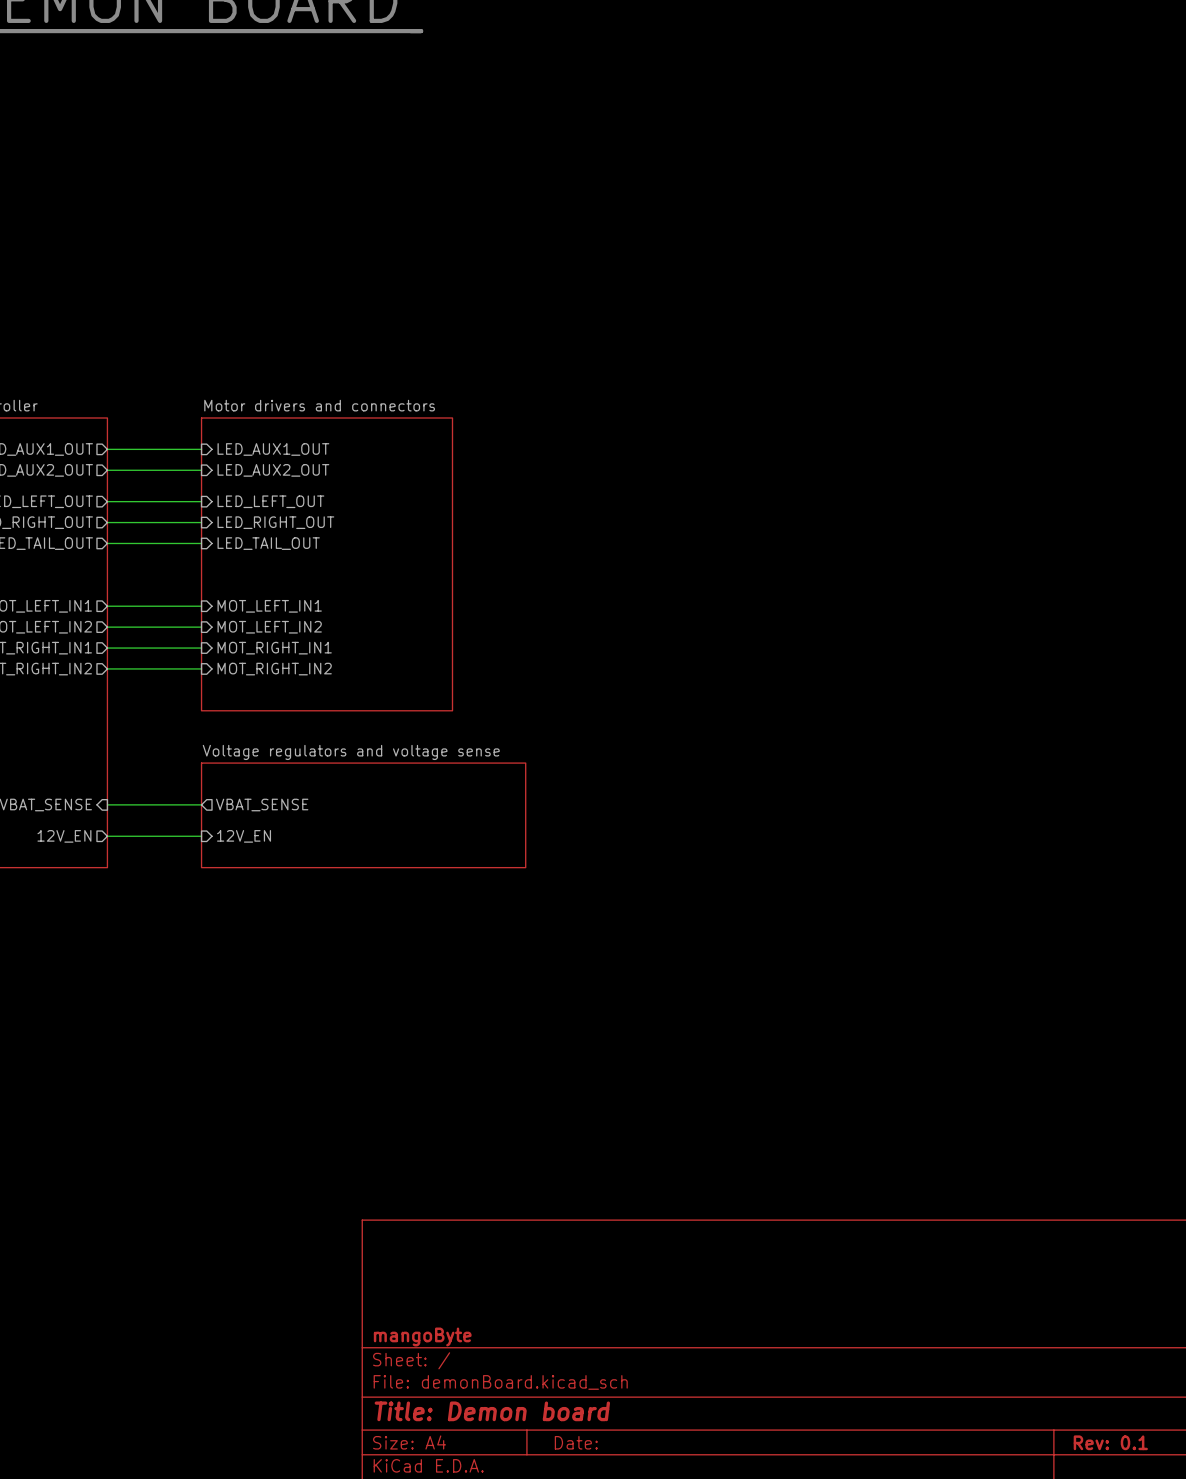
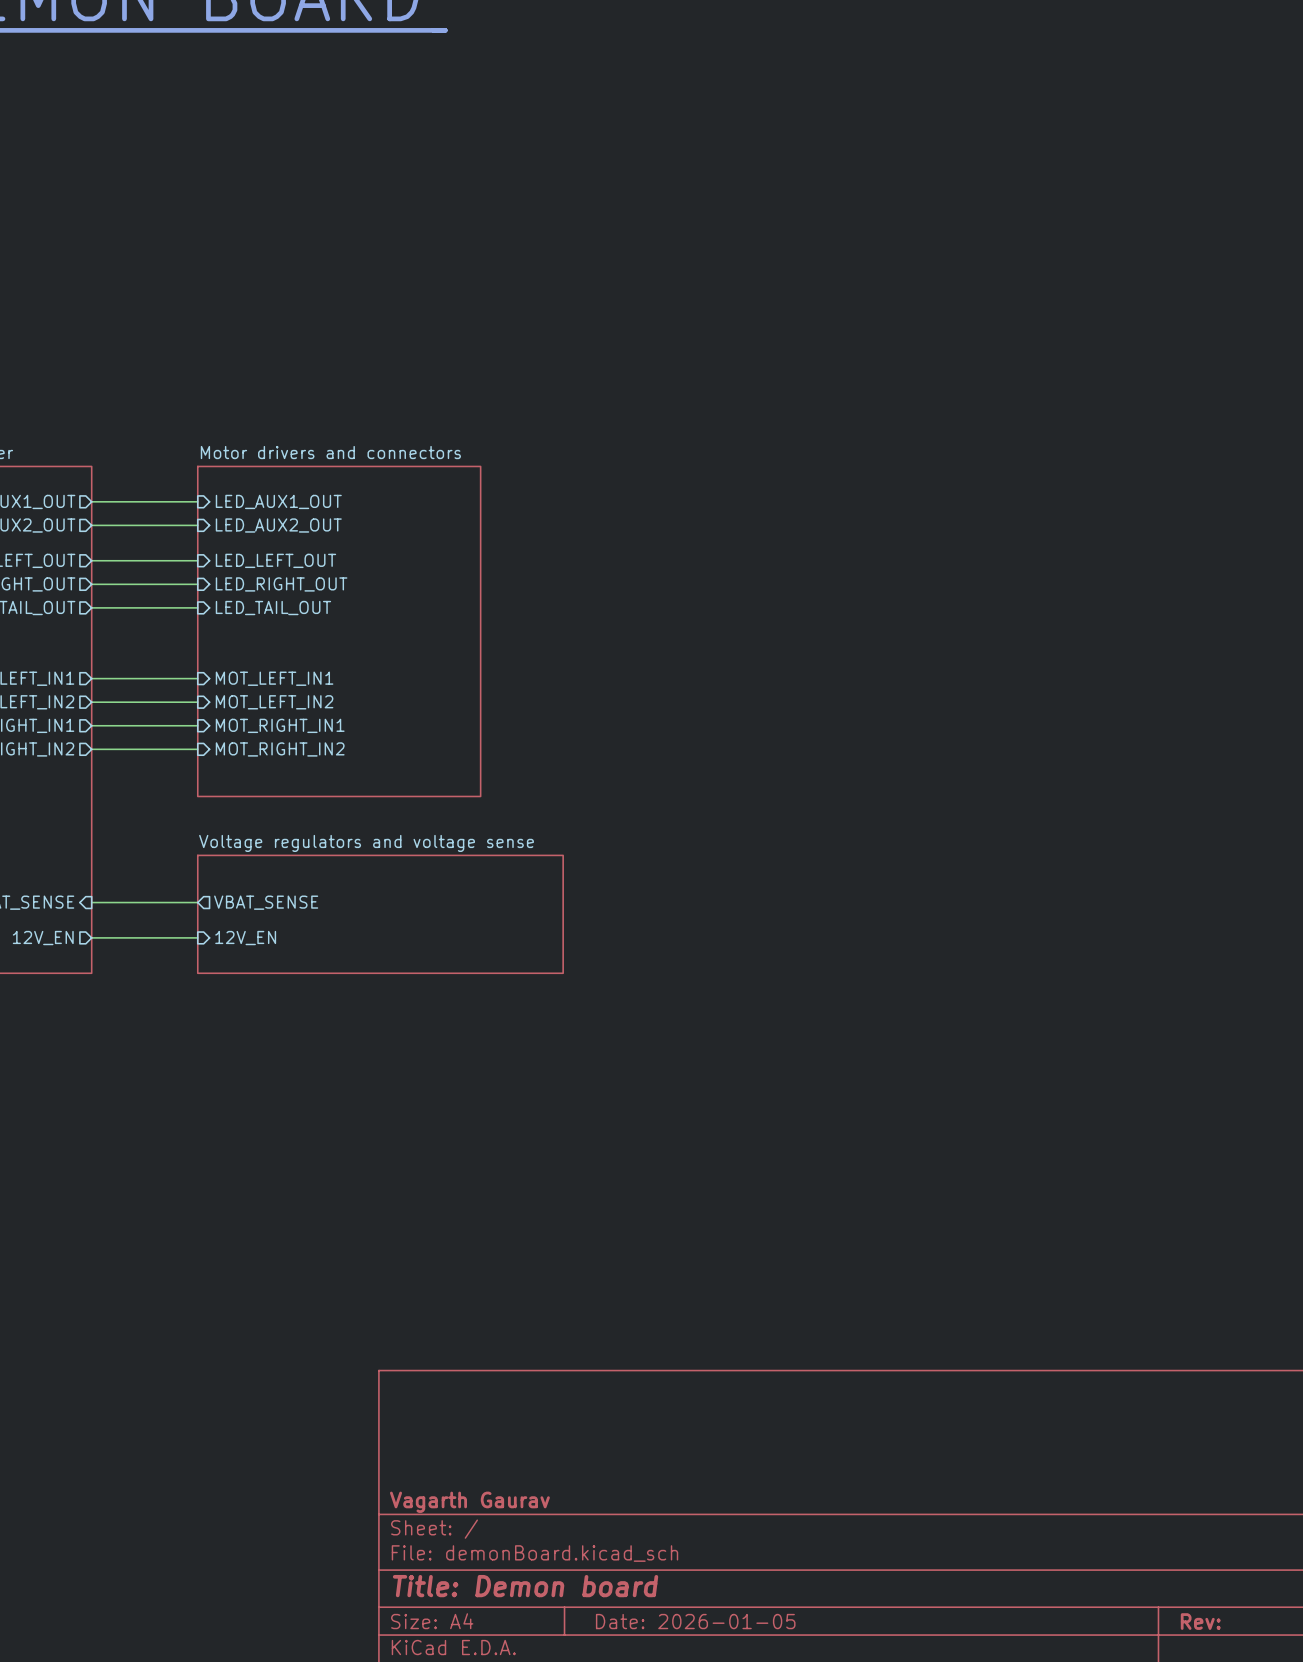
title block: mangoByte (422, 1336) -> Vagarth Gaurav (469, 1502)
title block: Date: (576, 1442) -> Date: 2026-01-05 (695, 1621)
title block: Rev: 0.1 (1110, 1442) -> Rev: (1200, 1621)

